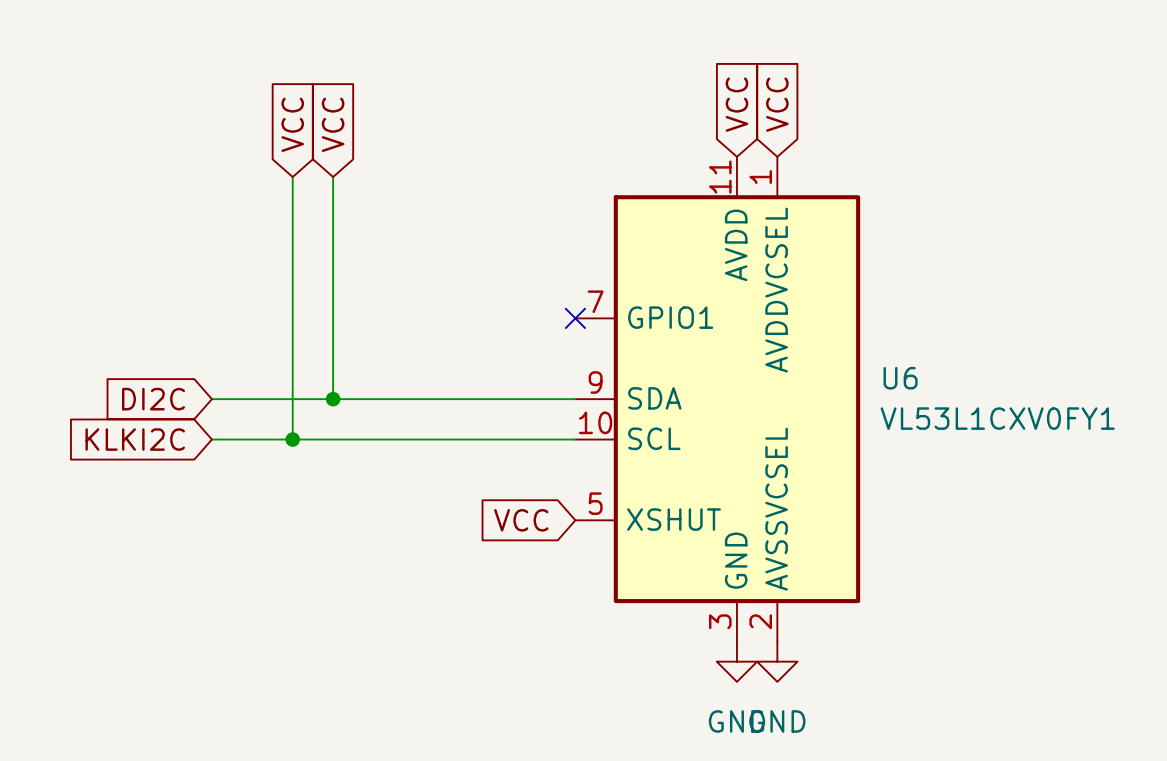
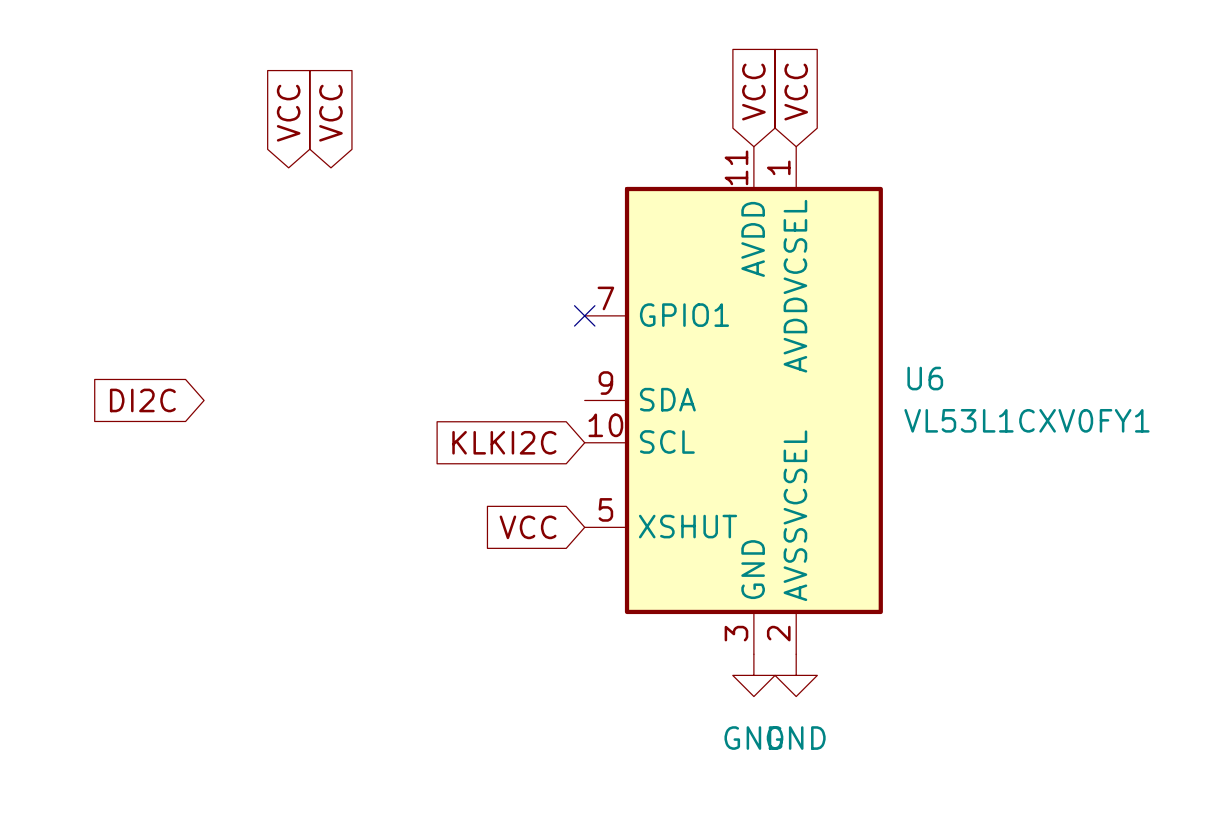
wire: (292, 177) (292, 439) -> none
wire: (333, 177) (333, 399) -> none
wire: (211, 399) (575, 399) -> none
junction: (333, 399) -> none
global label position: KLKI2C (135, 439) -> KLKI2C (504, 442)
wire: (211, 439) (575, 439) -> none
junction: (292, 439) -> none

